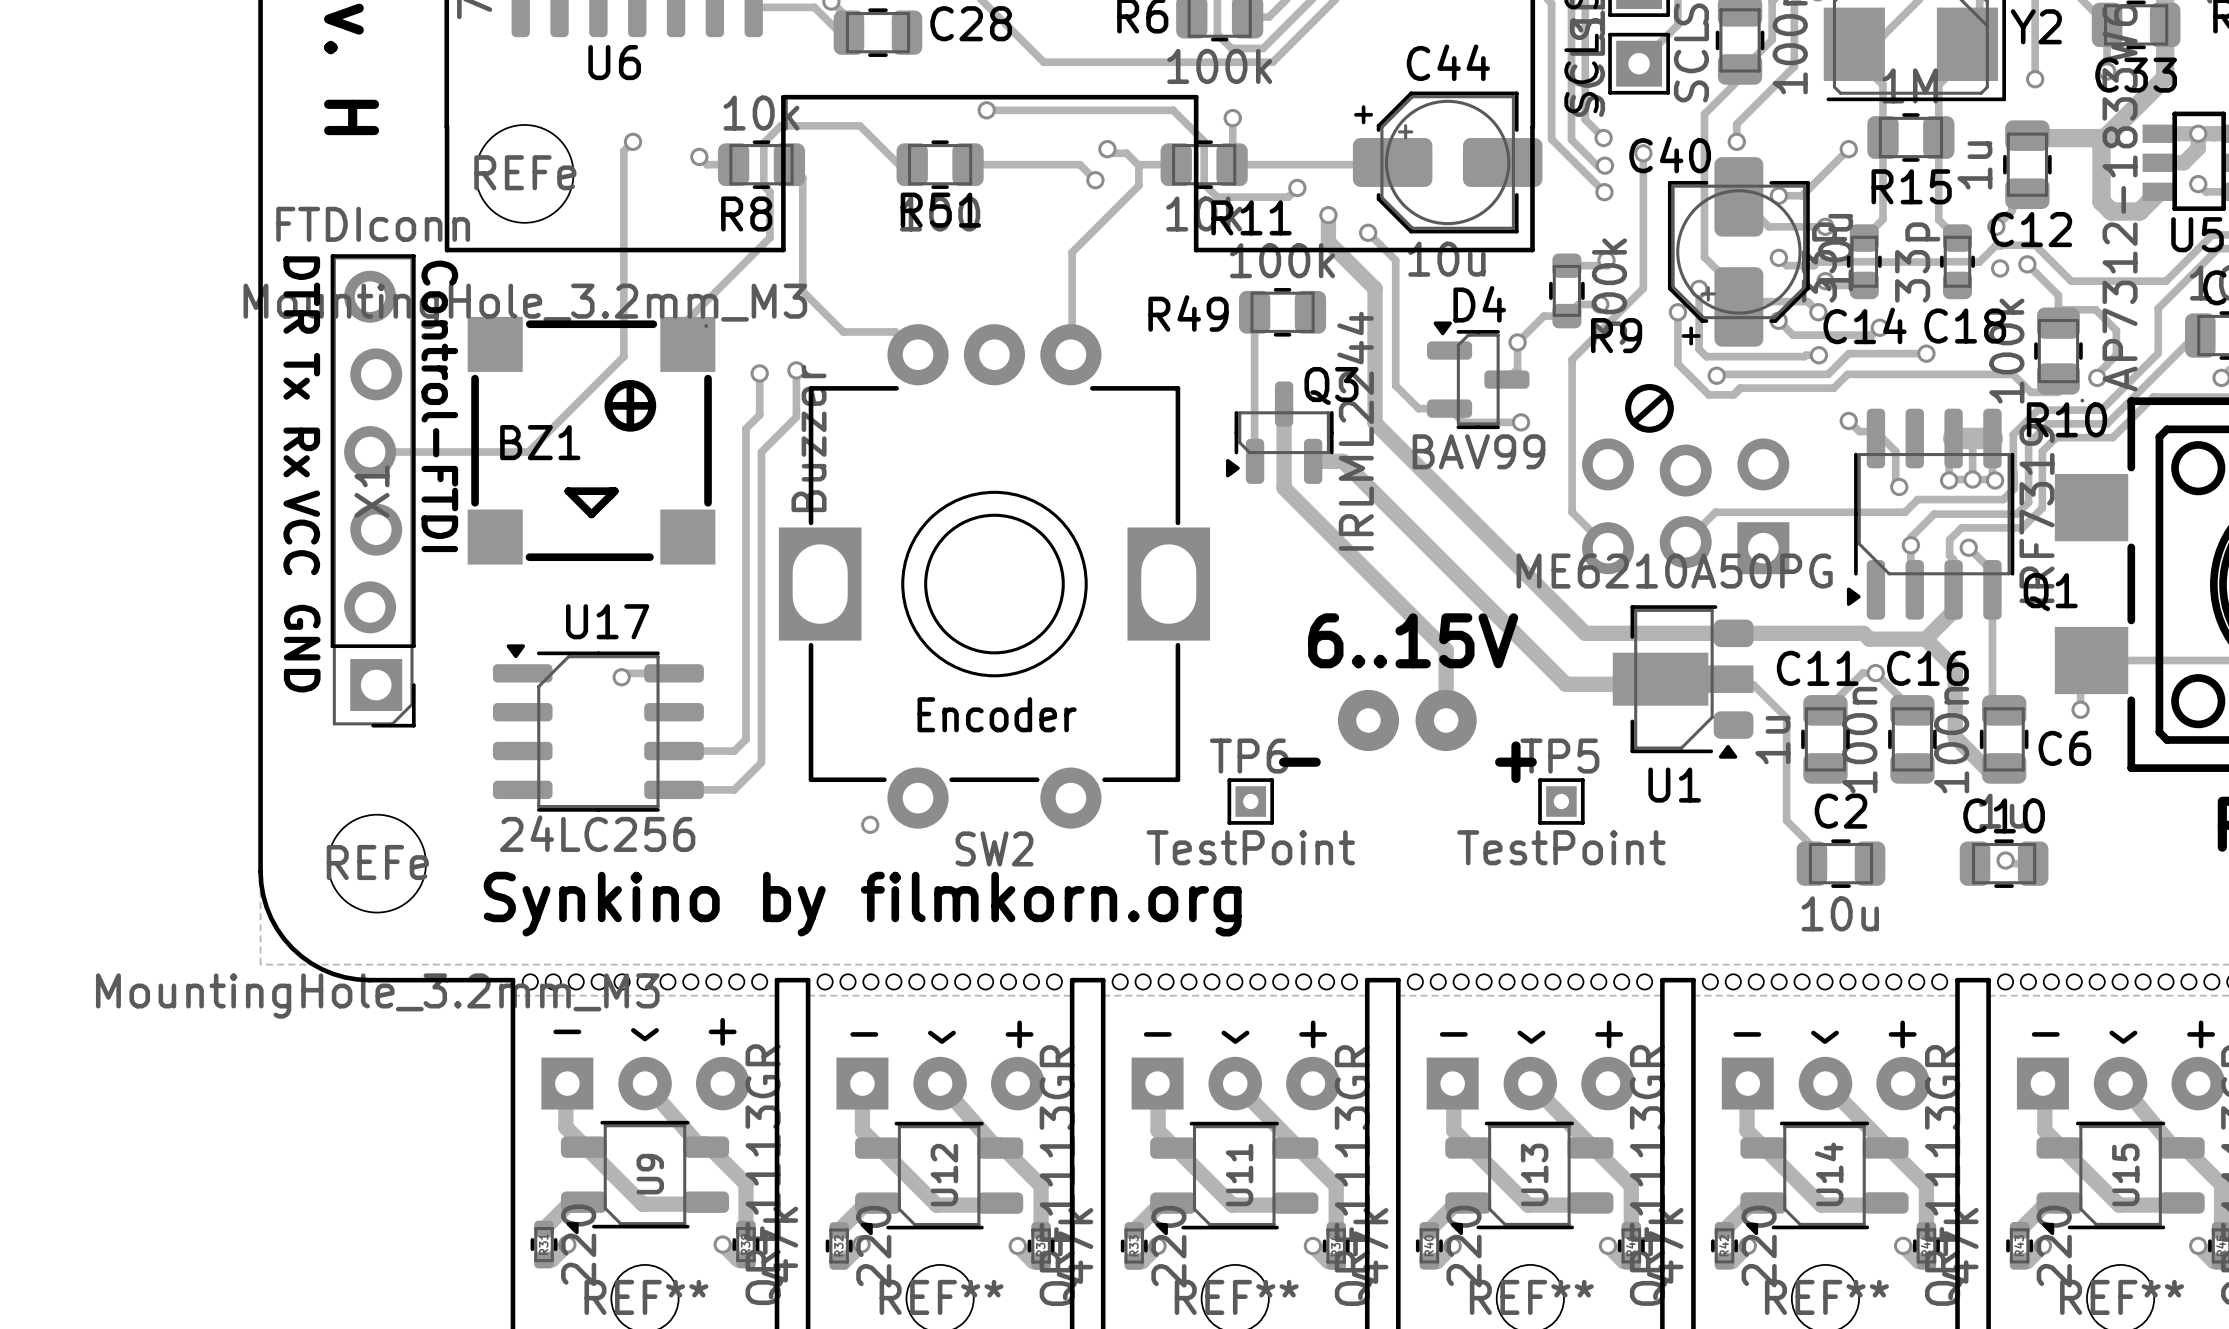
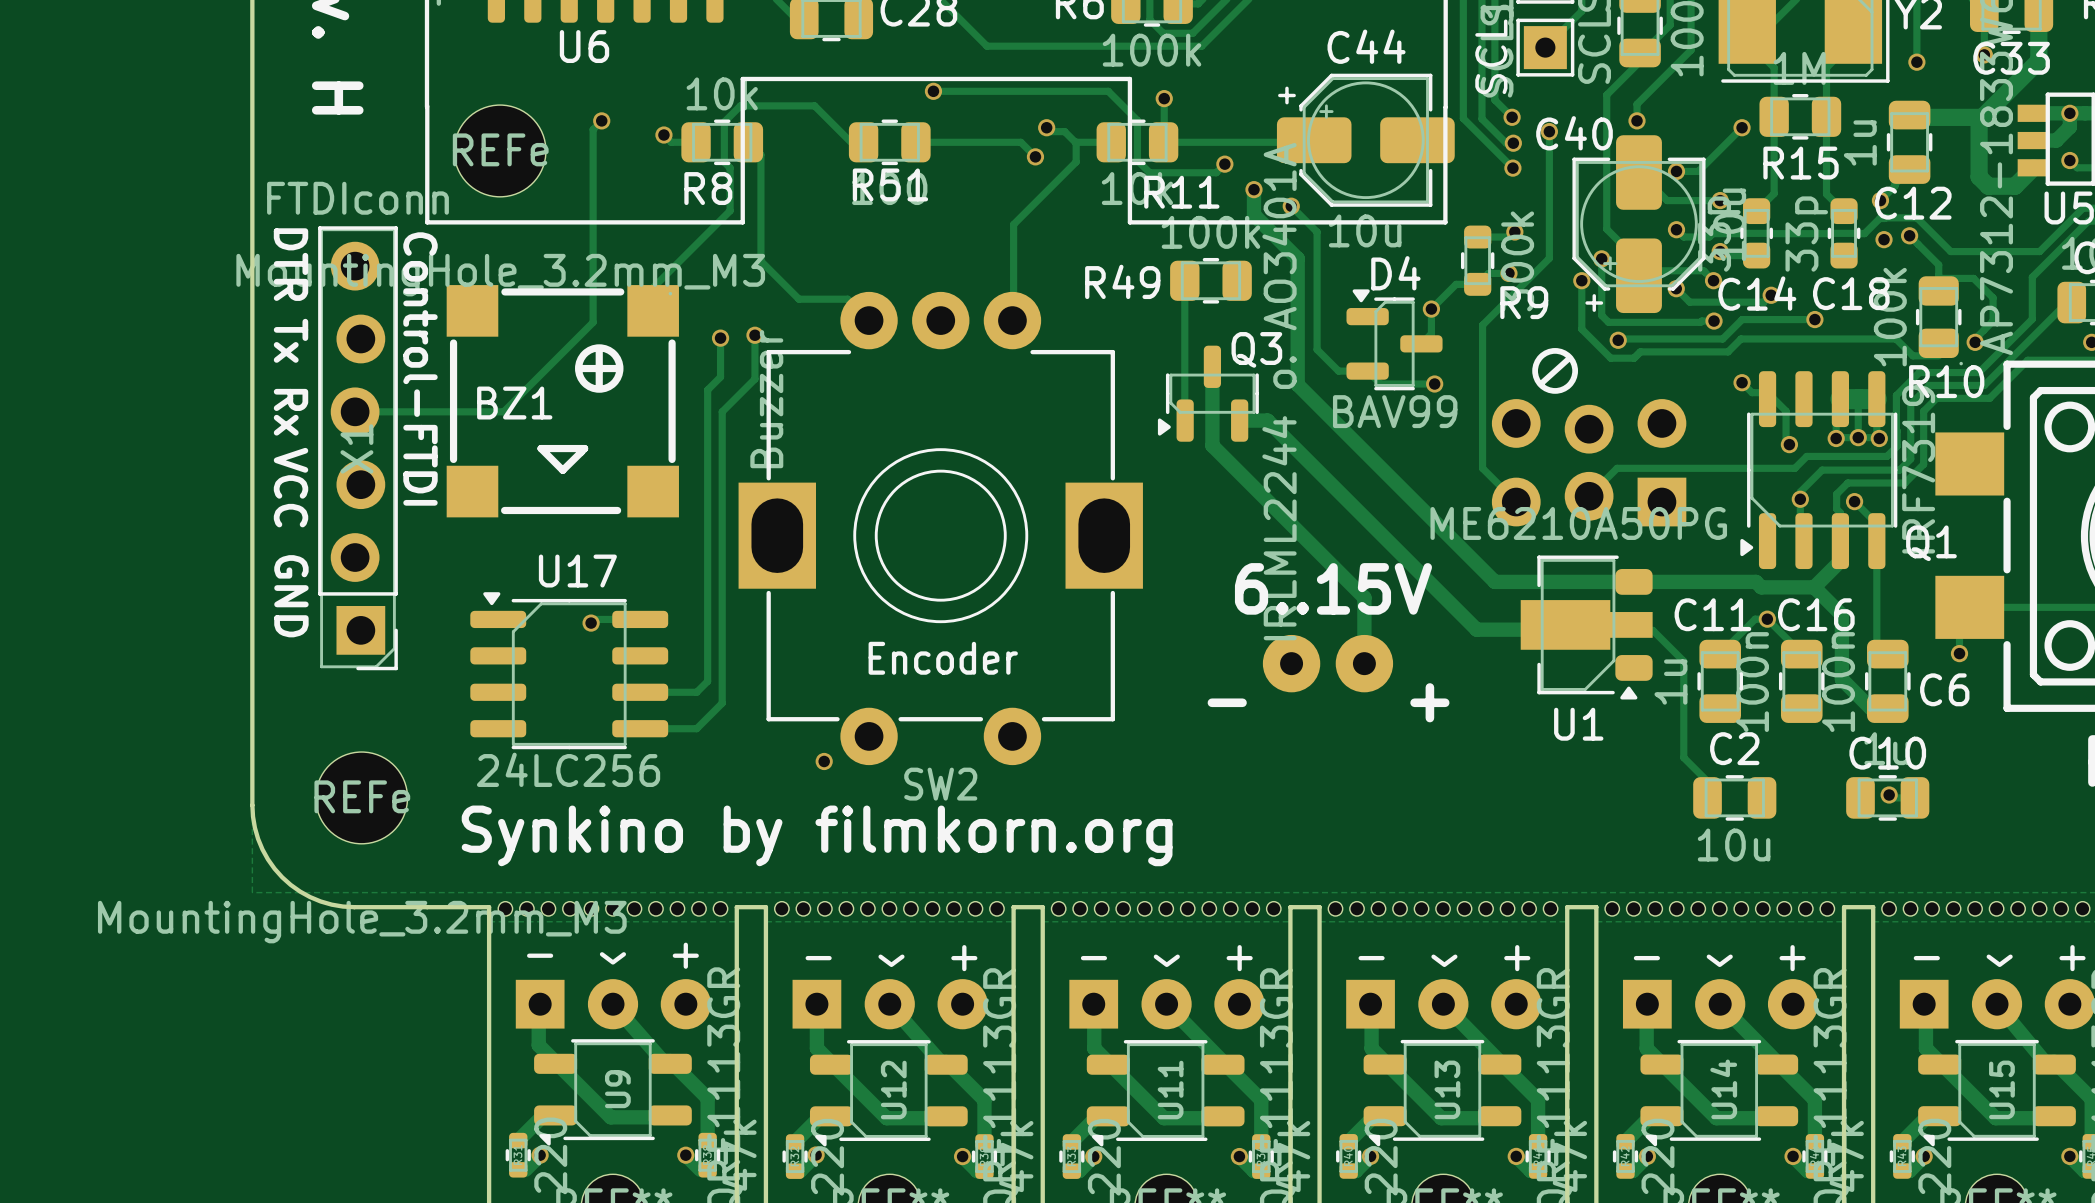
Q3 value: IRLML2244 (1355, 431) -> IRLML2244 o. AO3401A (1279, 391)
TP6: TestPoint (1250, 801) -> none
TP5: TestPoint (1561, 801) -> none

